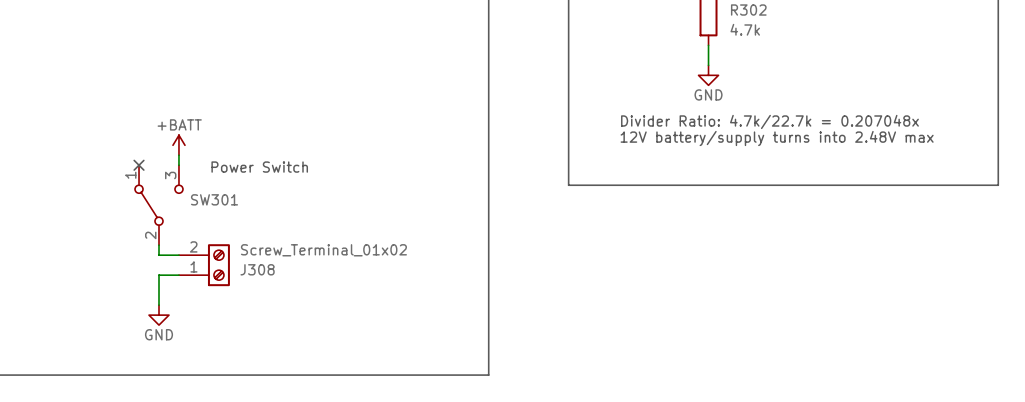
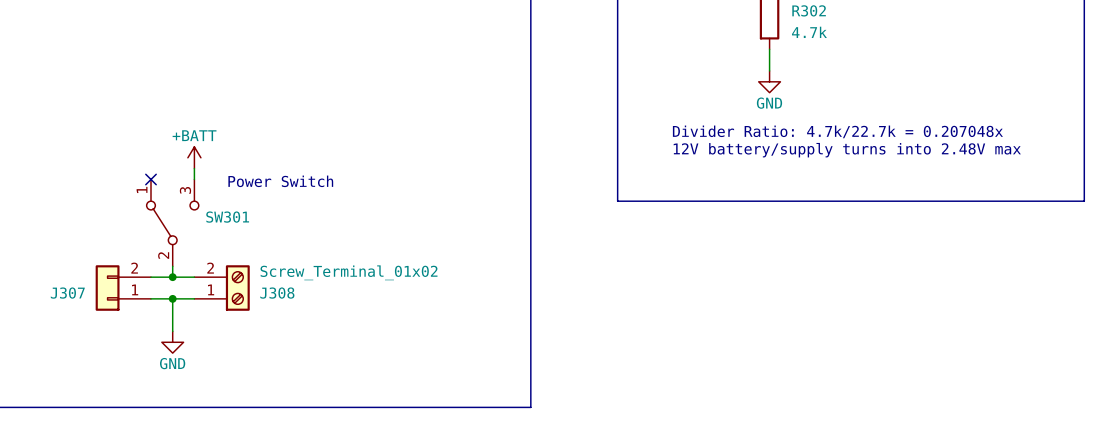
wire: none -> (150, 277) (172, 277)
junction: none -> (172, 277)
J307: none -> (123, 288)
wire: none -> (150, 298) (172, 298)
junction: none -> (172, 298)

